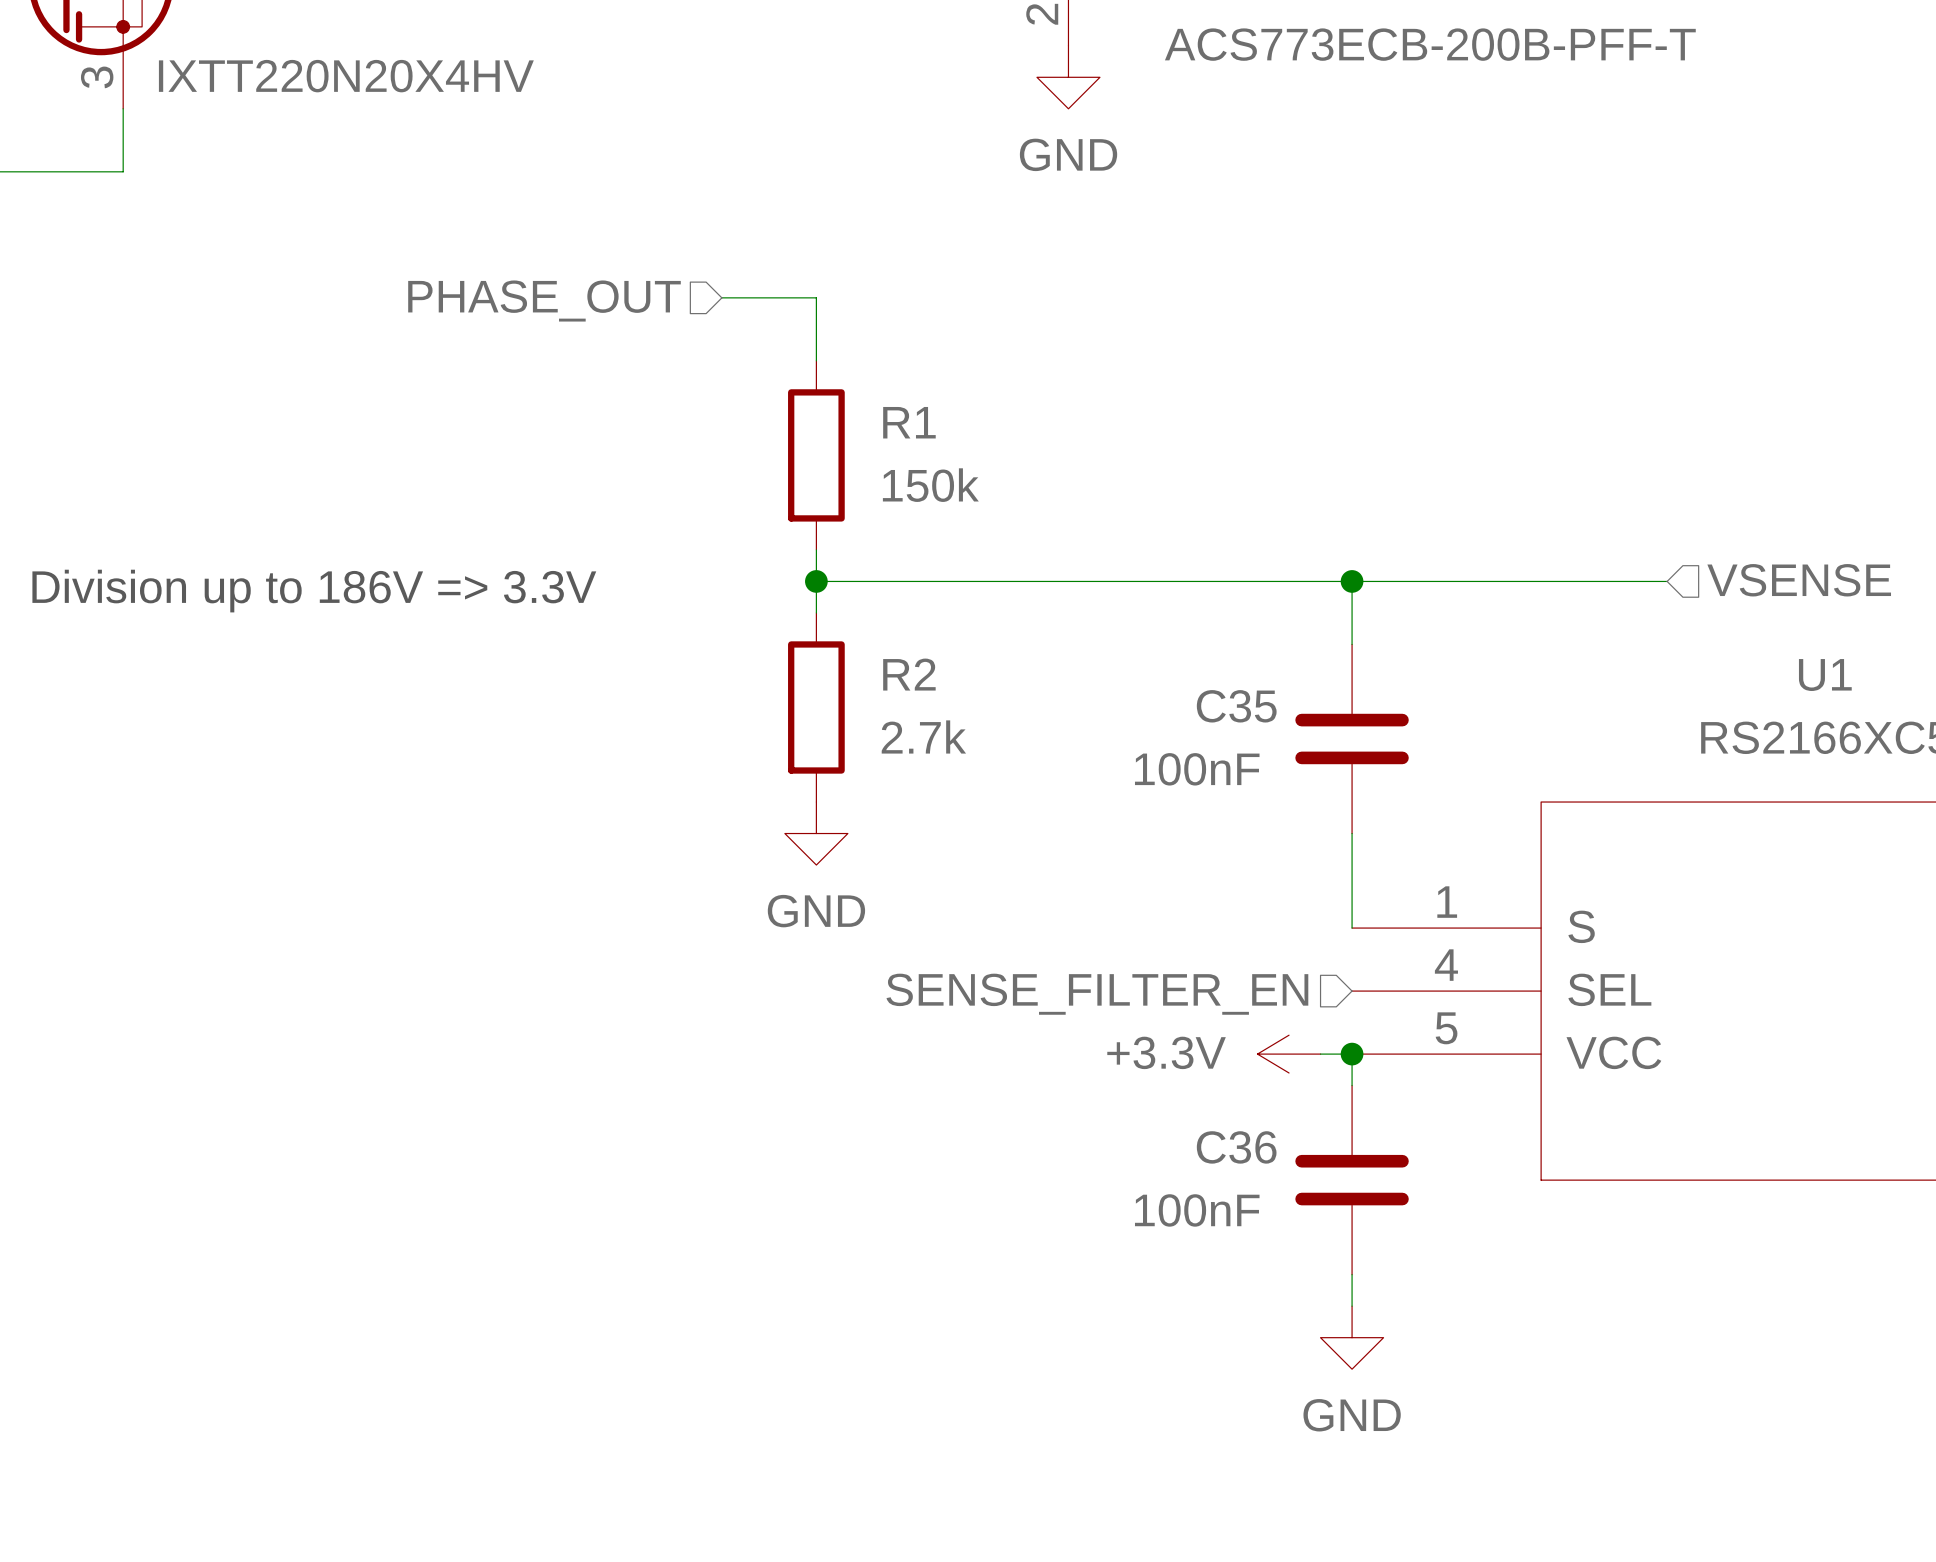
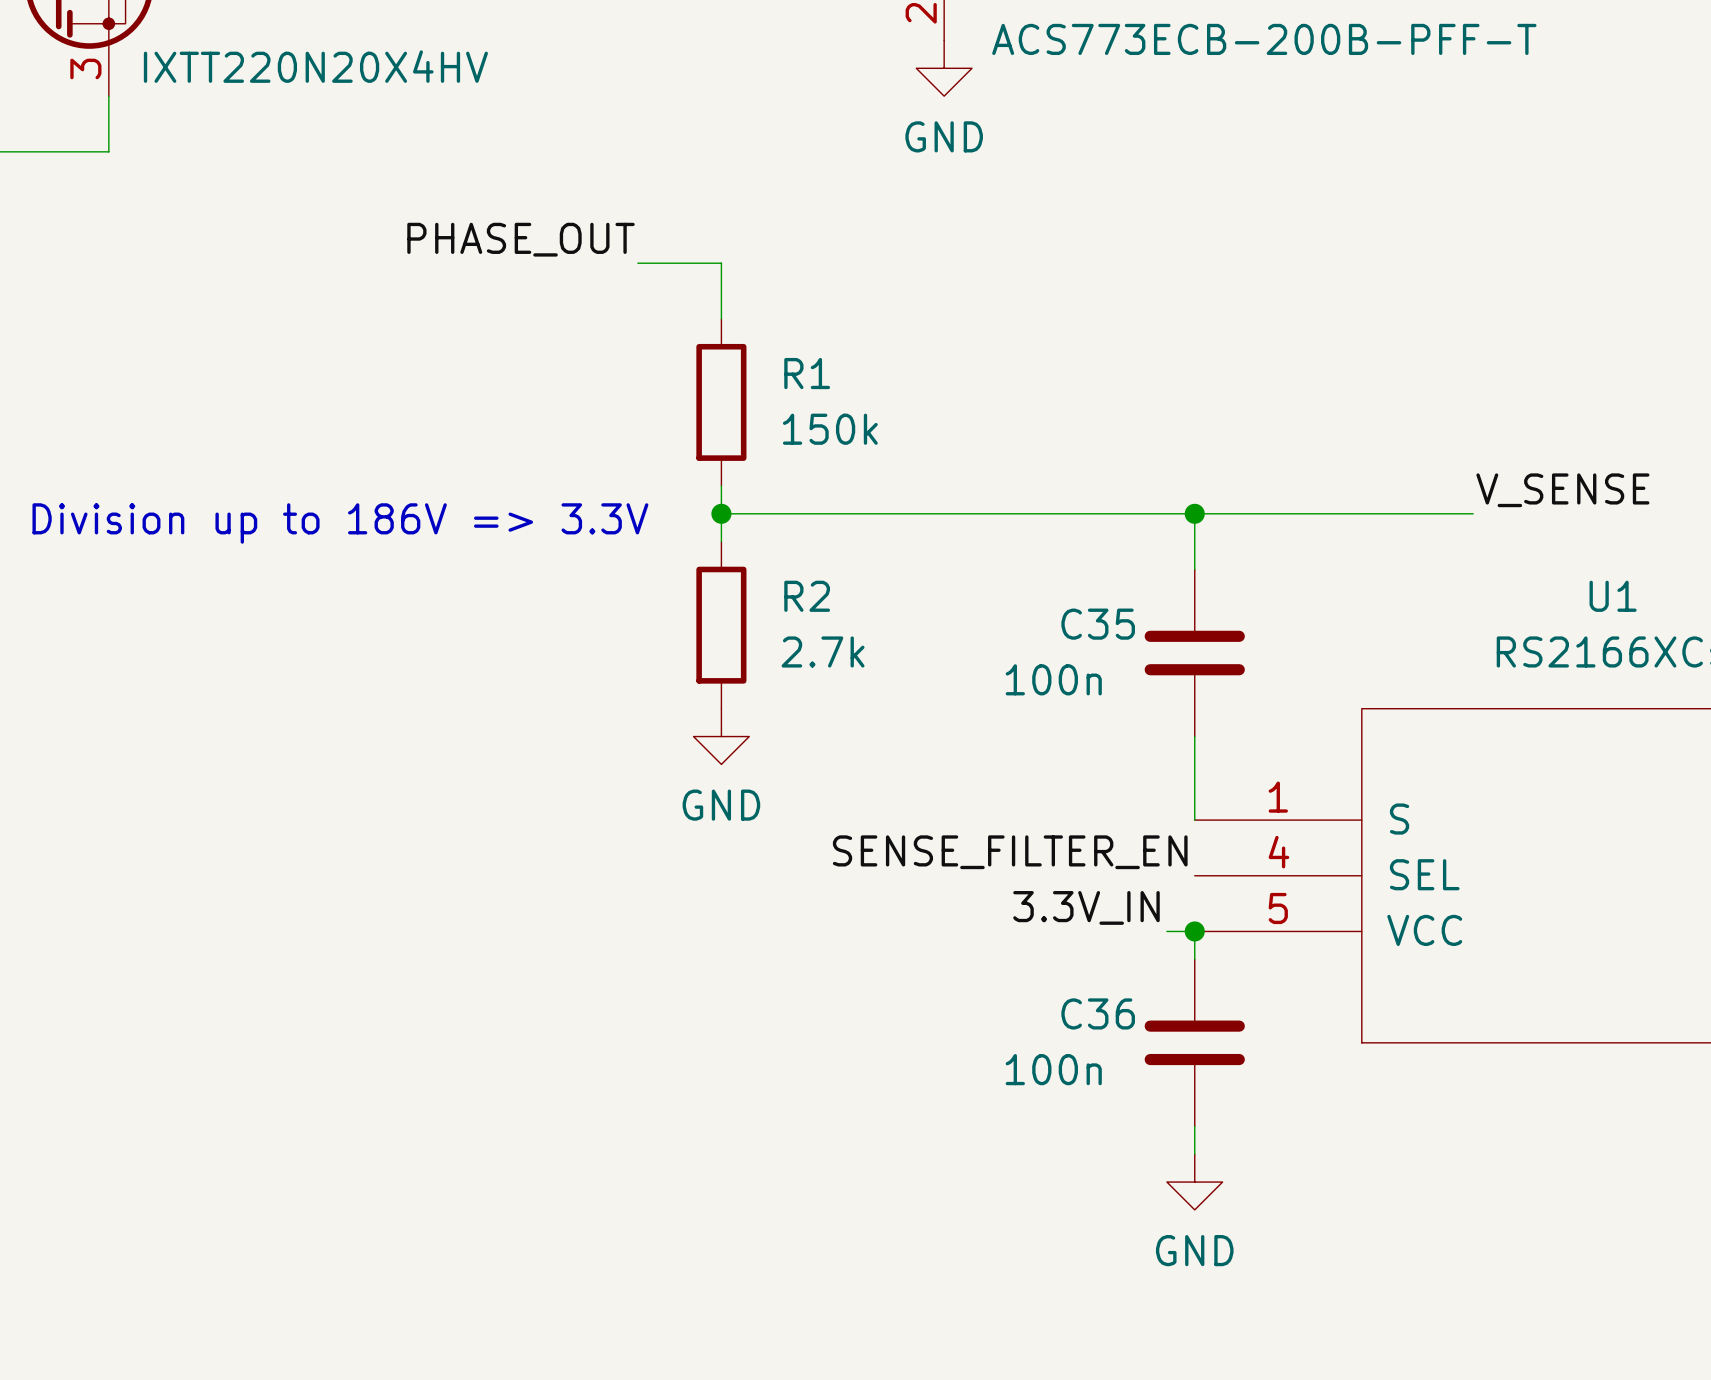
label: none -> PHASE_OUT (520, 239)
hierarchical label: PHASE_OUT (544, 301) -> none
label: none -> V_SENSE (1562, 490)
hierarchical label: VSENSE (1799, 580) -> none
C35 value: 100nF (1197, 769) -> 100n (1053, 679)
label: none -> SENSE_FILTER_EN (1010, 852)
hierarchical label: SENSE_FILTER_EN (1097, 994) -> none
label: none -> 3.3V_IN (1086, 907)
power symbol: +3.3V (1289, 1054) -> none
C36 value: 100nF (1197, 1210) -> 100n (1053, 1069)

